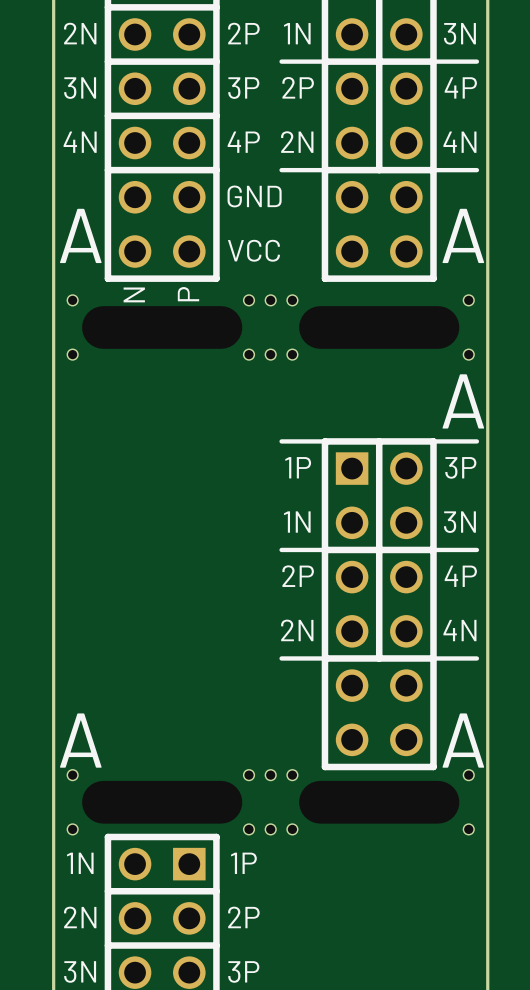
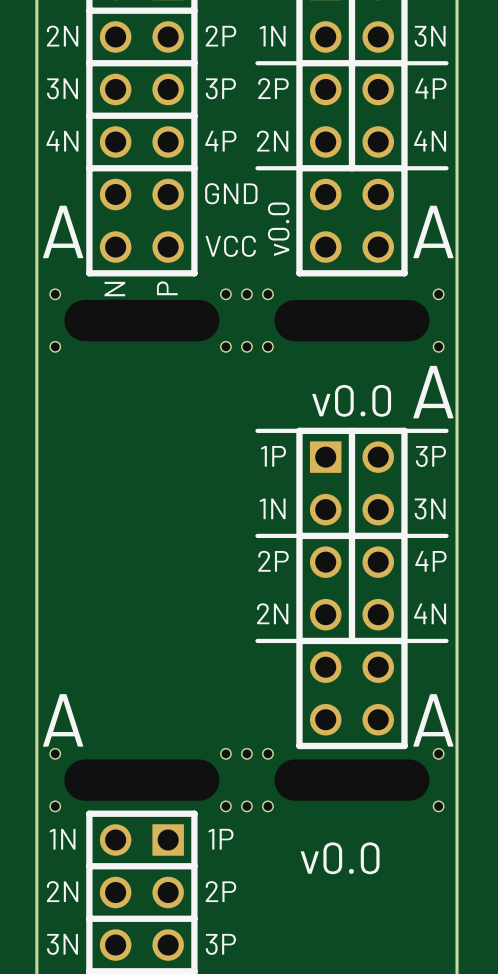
text: none -> v0.0 (278, 229)
text: none -> v0.0 (351, 400)
text: none -> v0.0 (340, 858)

